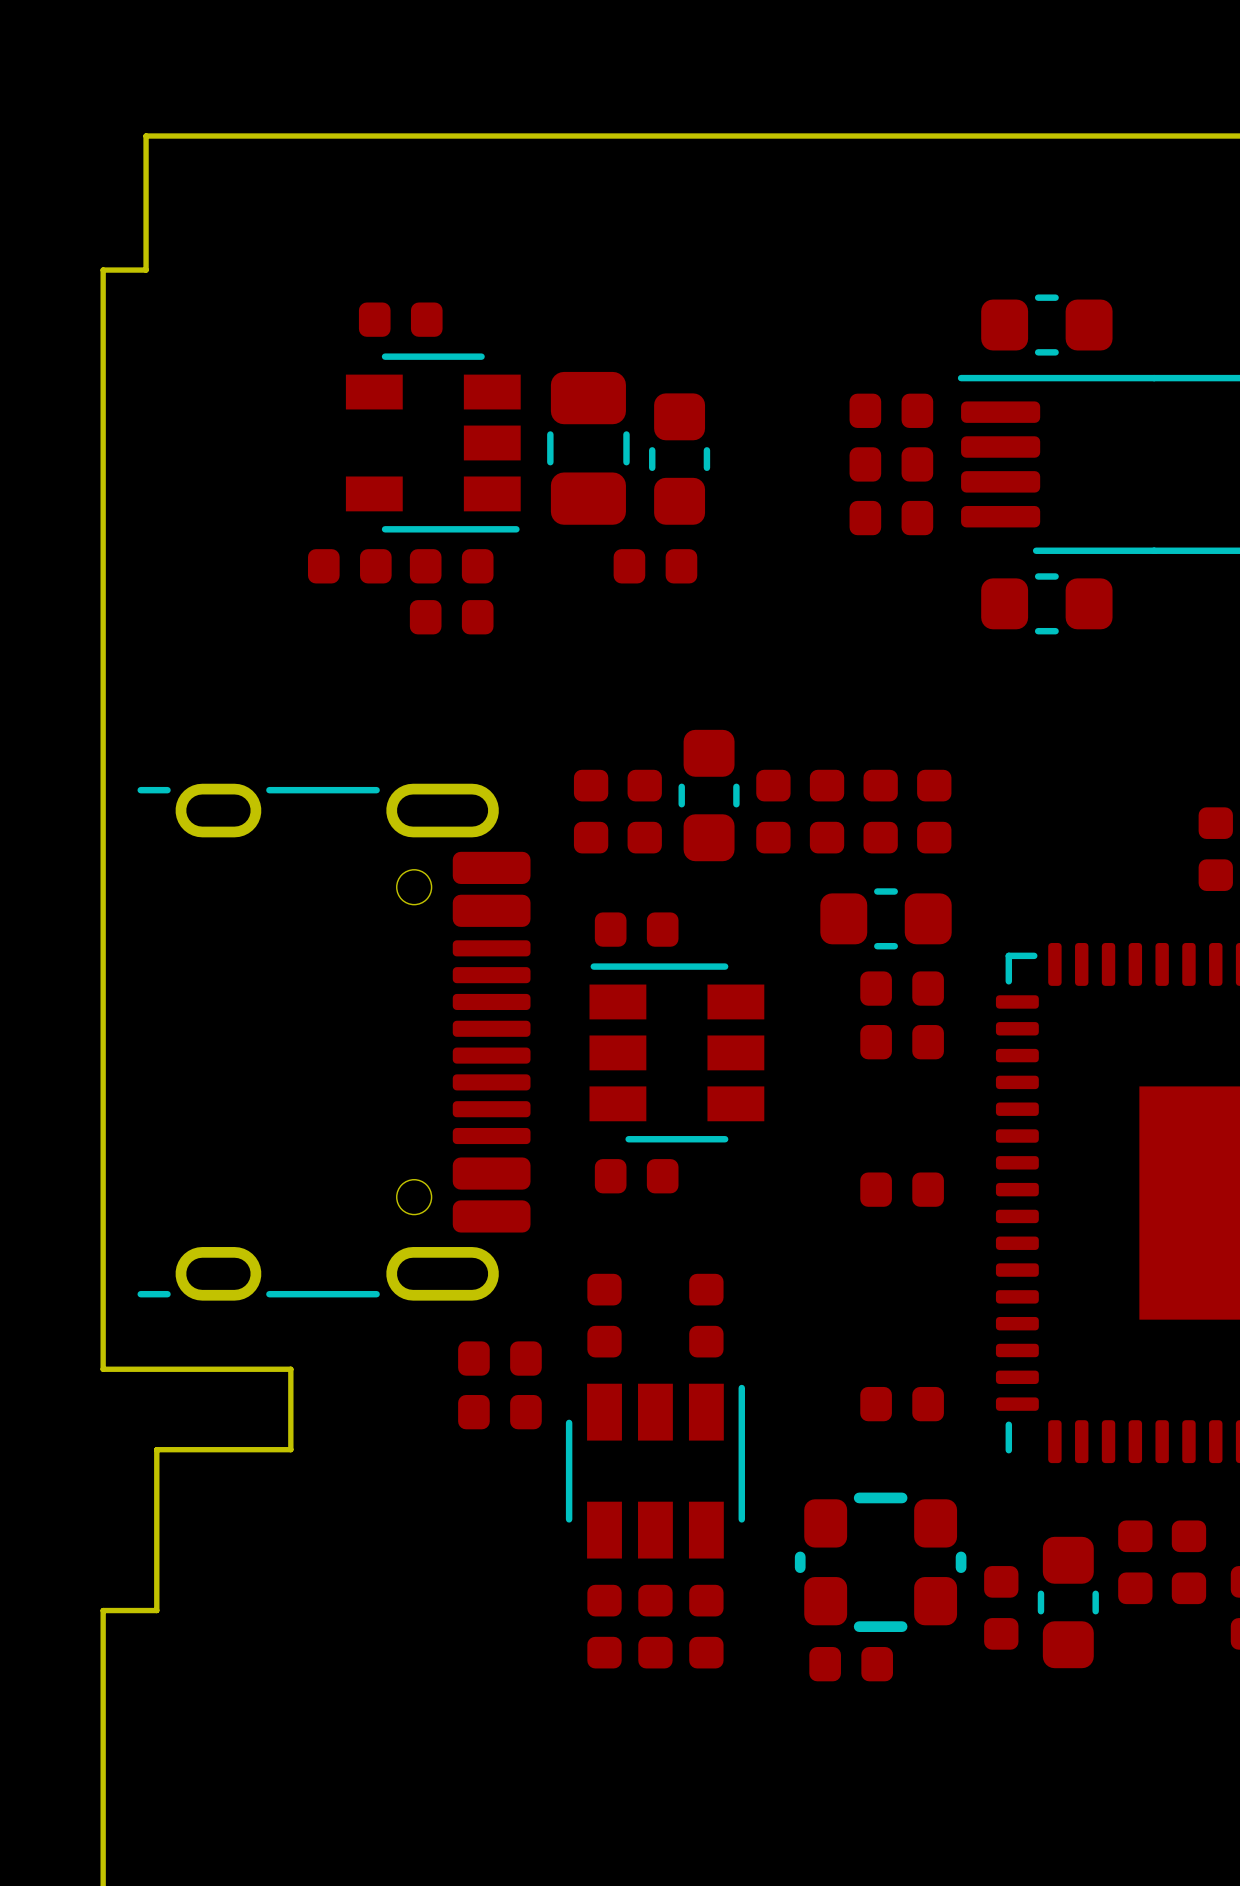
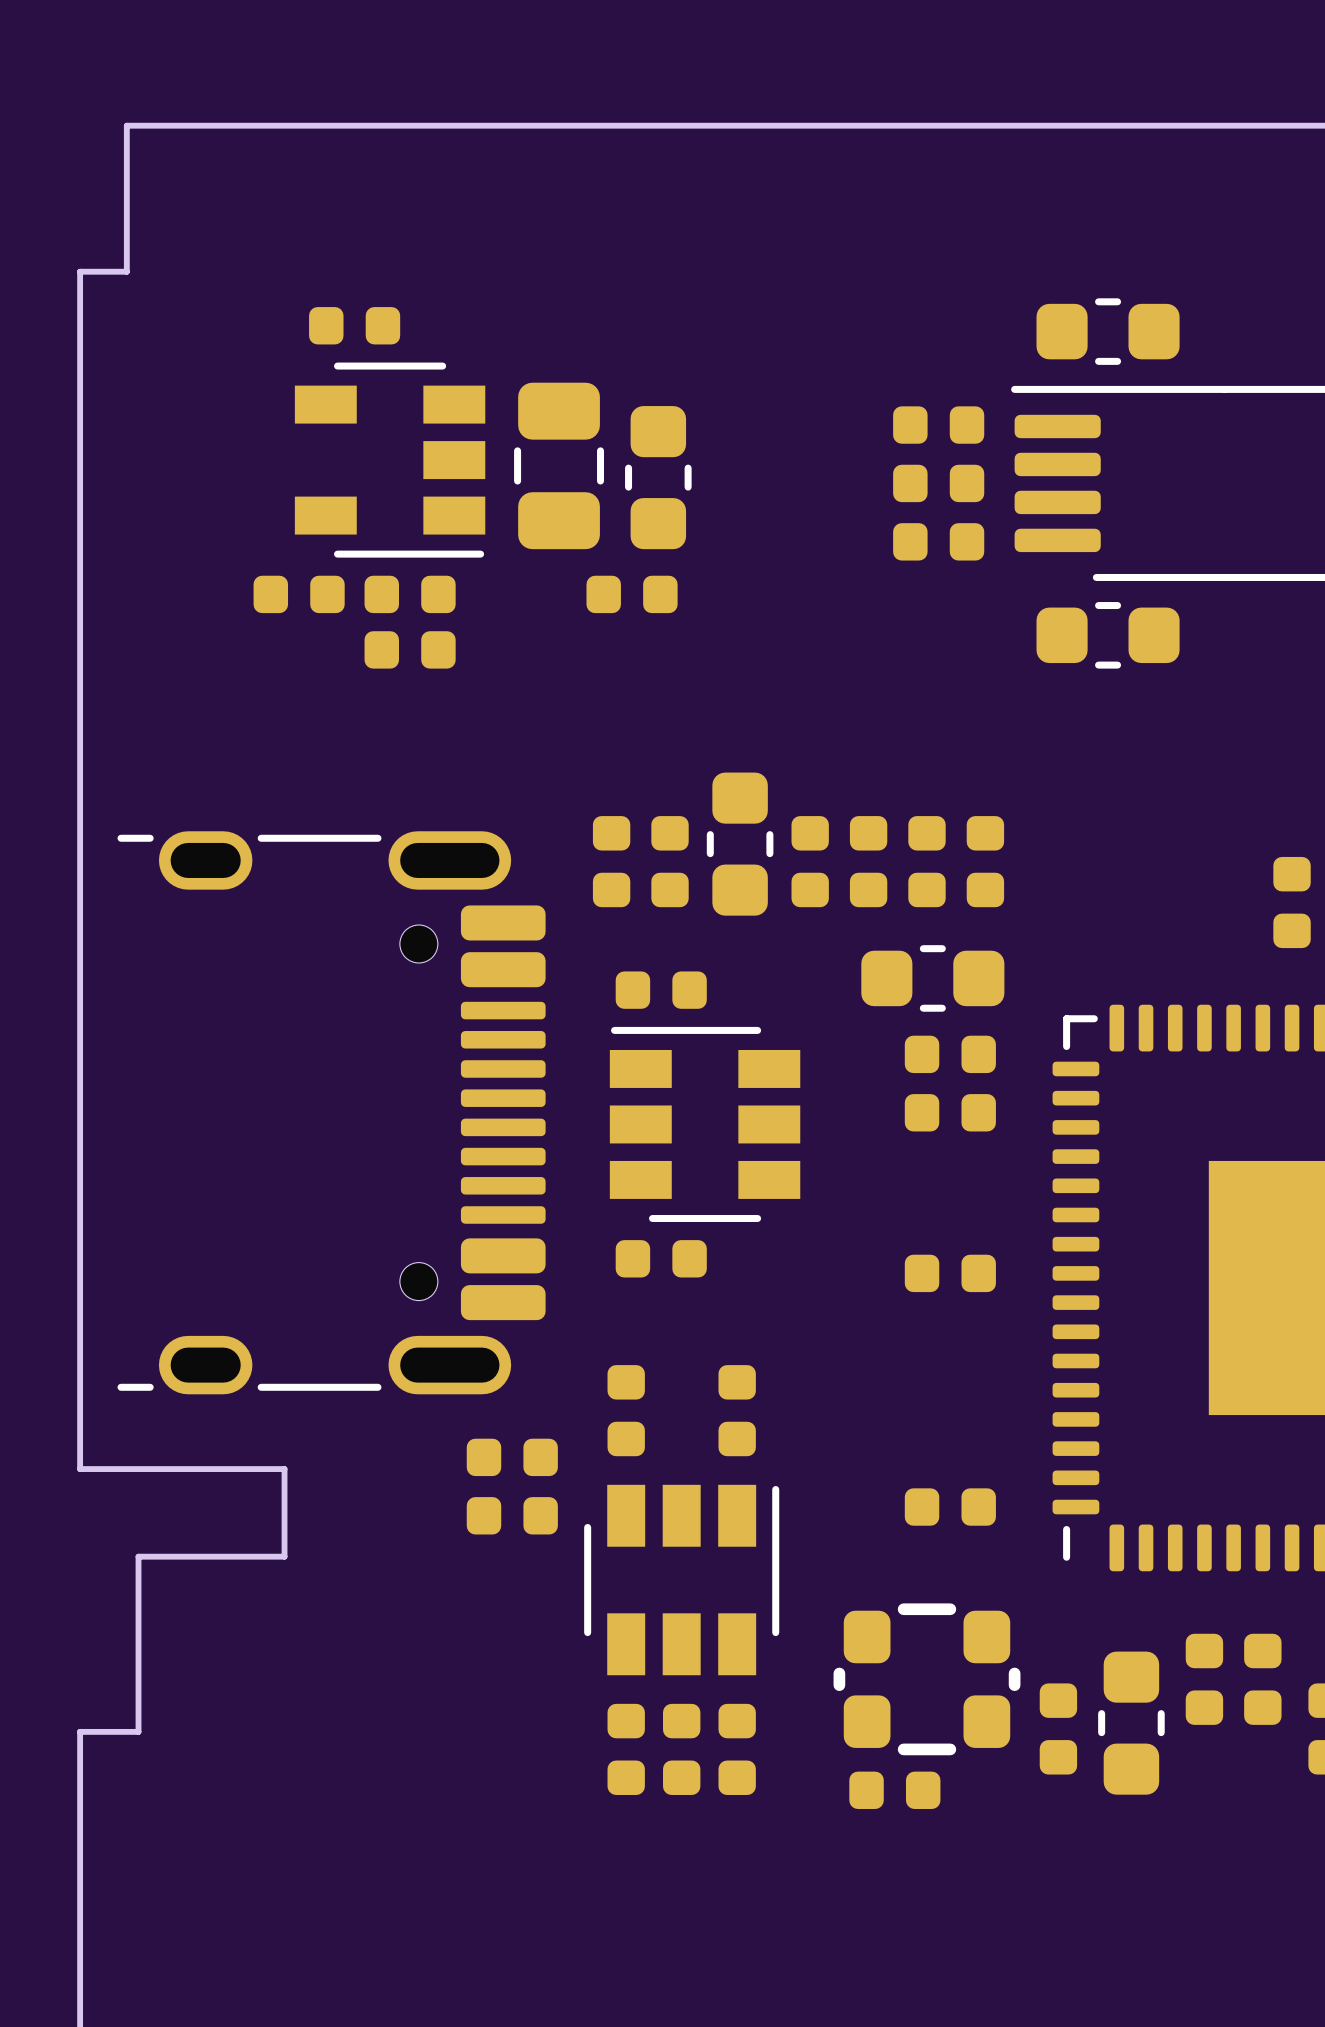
part position: (400, 319) -> (354, 325)
part position: (433, 442) -> (390, 460)
part position: (588, 448) -> (559, 465)
part position: (679, 459) -> (658, 477)
part: none -> (299, 594)
part: (349, 566) -> none
part: none -> (410, 594)
part: (451, 566) -> none
part position: (655, 566) -> (632, 594)
part: none -> (410, 649)
part: (451, 617) -> none

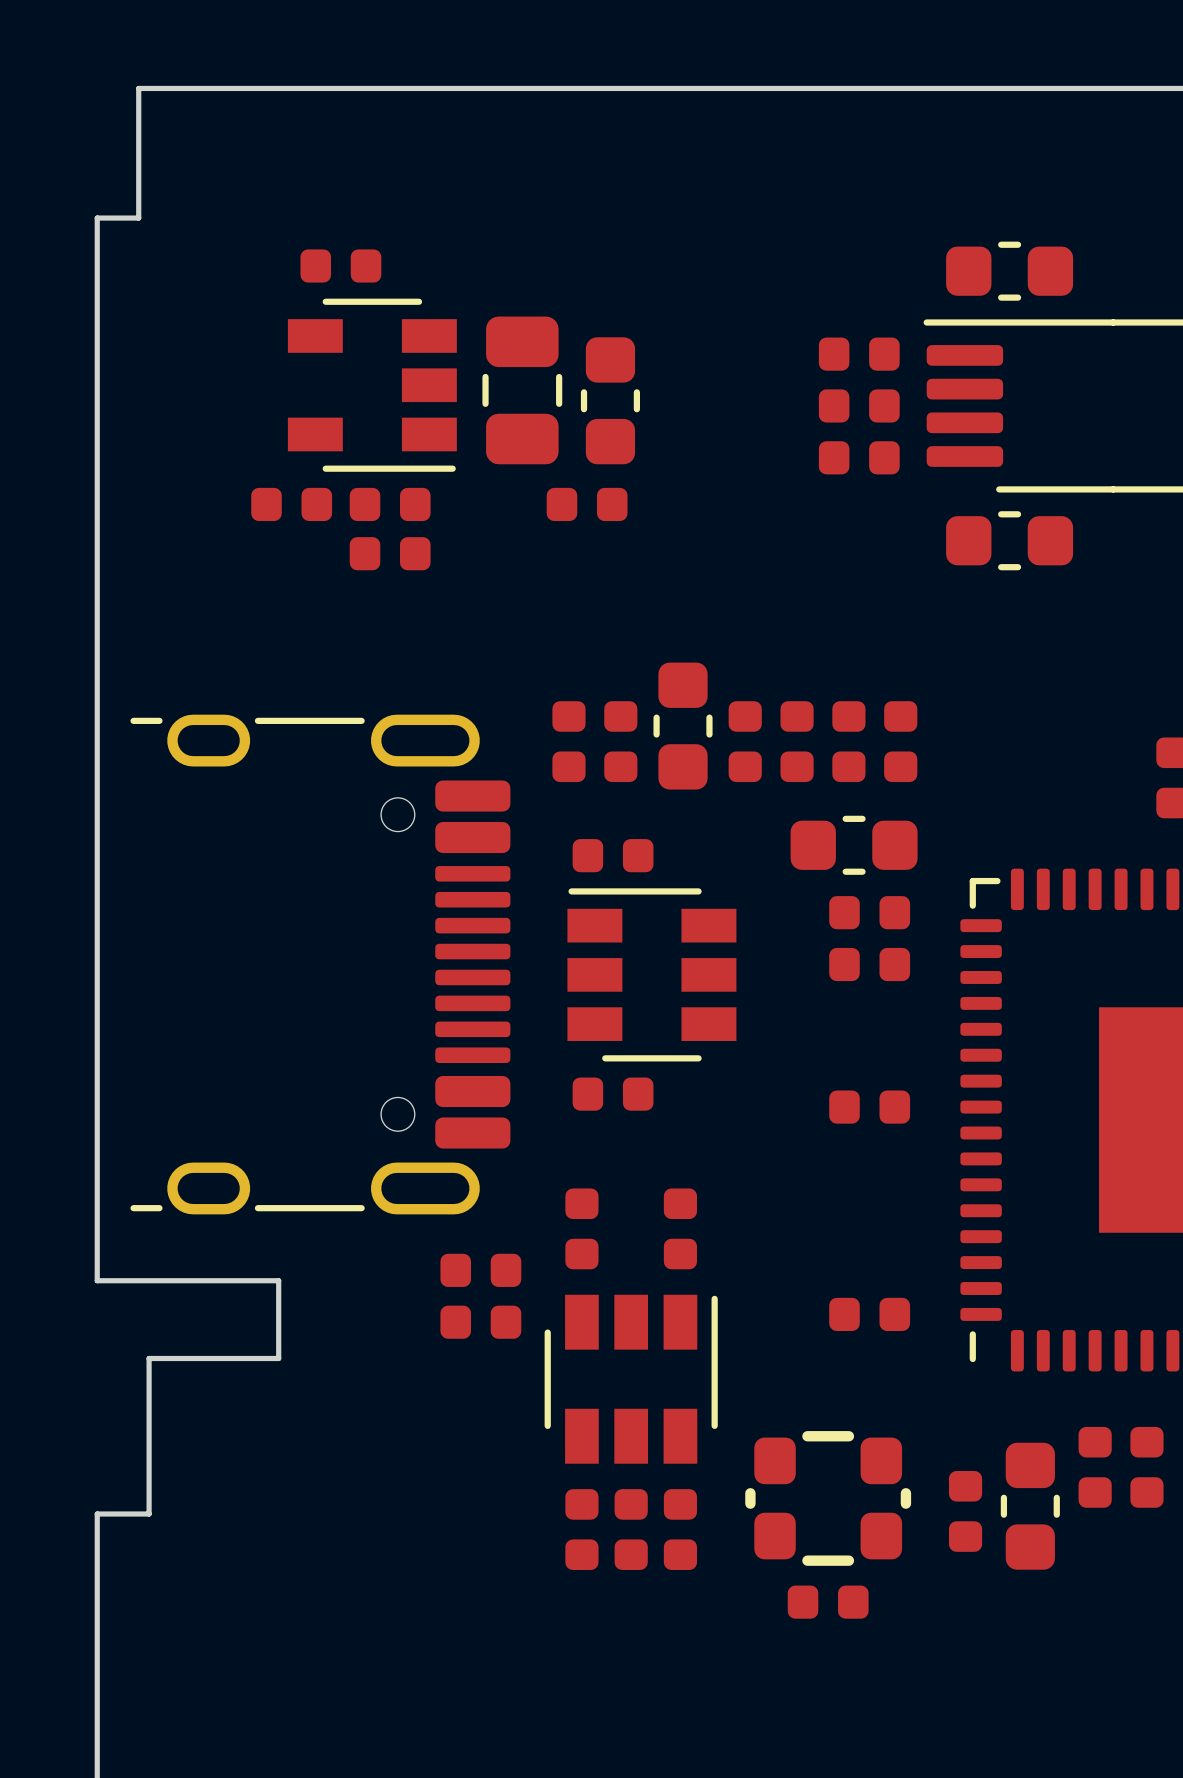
part position: (927, 1679) -> (828, 1498)
part position: (894, 1790) -> (828, 1602)

